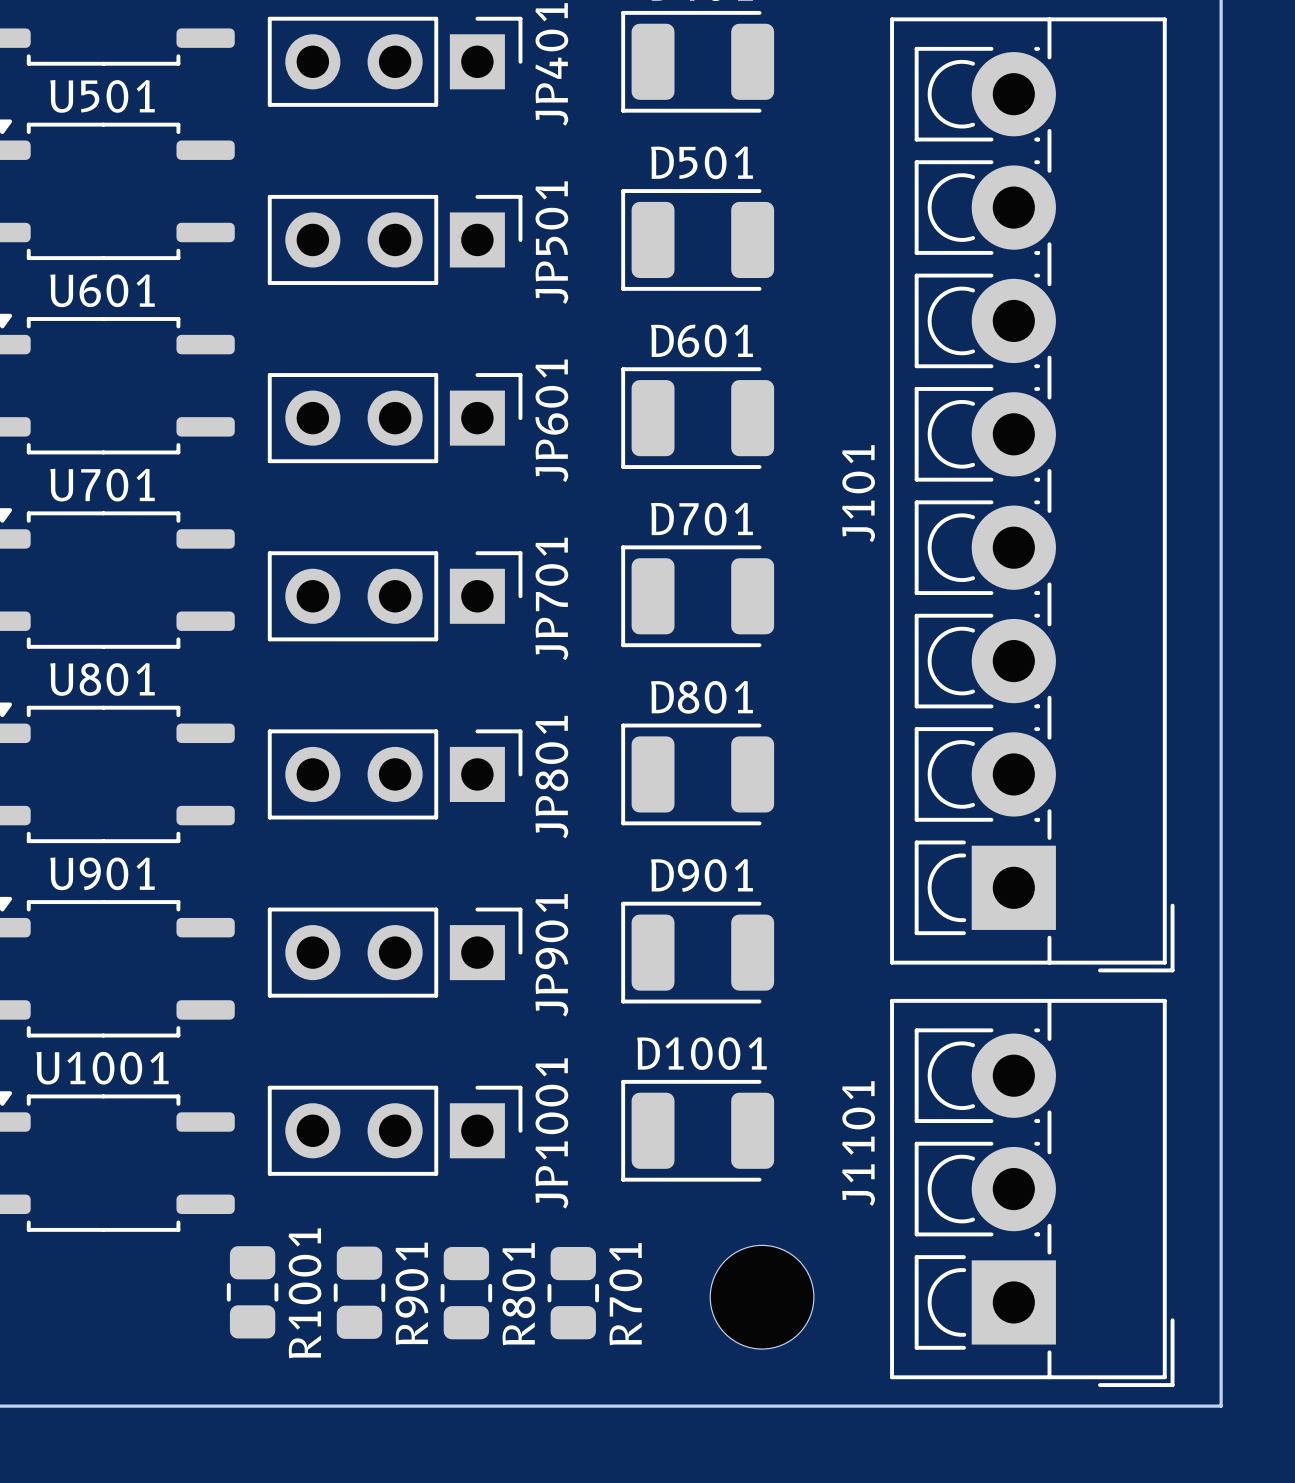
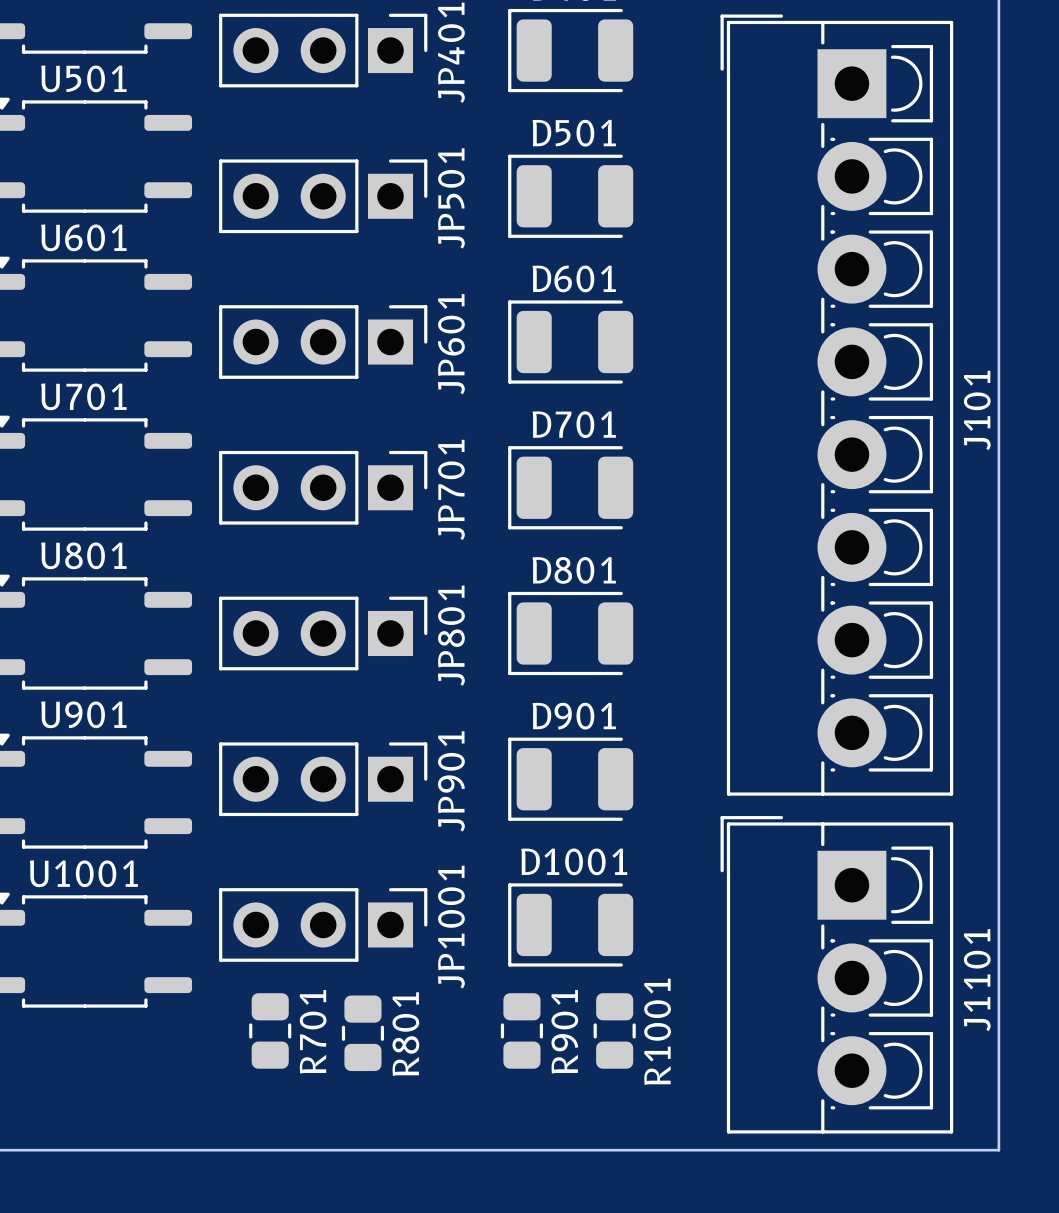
J101 rotation: 0° (1032, 494) -> 180° (836, 405)
J1101 rotation: 0° (1032, 1192) -> 180° (836, 974)
R1001 position: (252, 1292) -> (614, 1030)
R901 position: (359, 1292) -> (521, 1030)
R801 position: (466, 1293) -> (362, 1033)
R701 position: (573, 1293) -> (270, 1030)
part: (762, 1297) -> none

